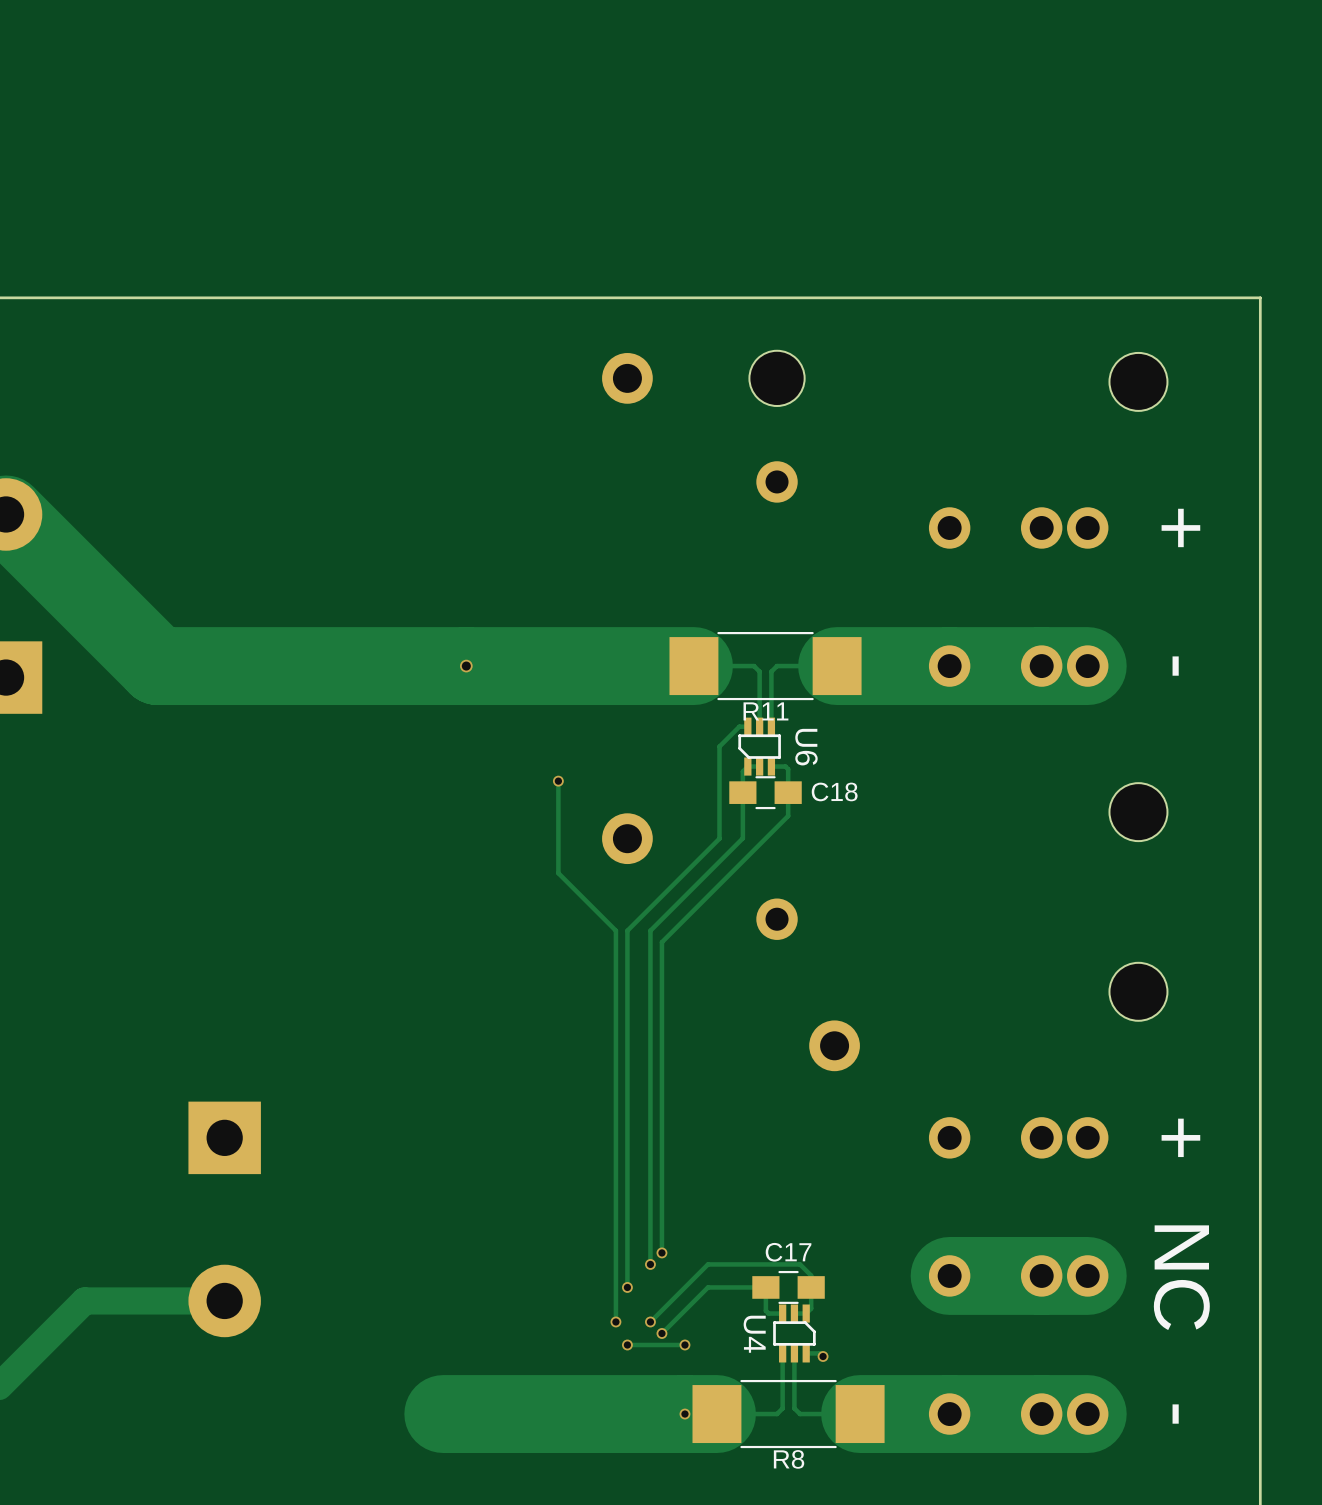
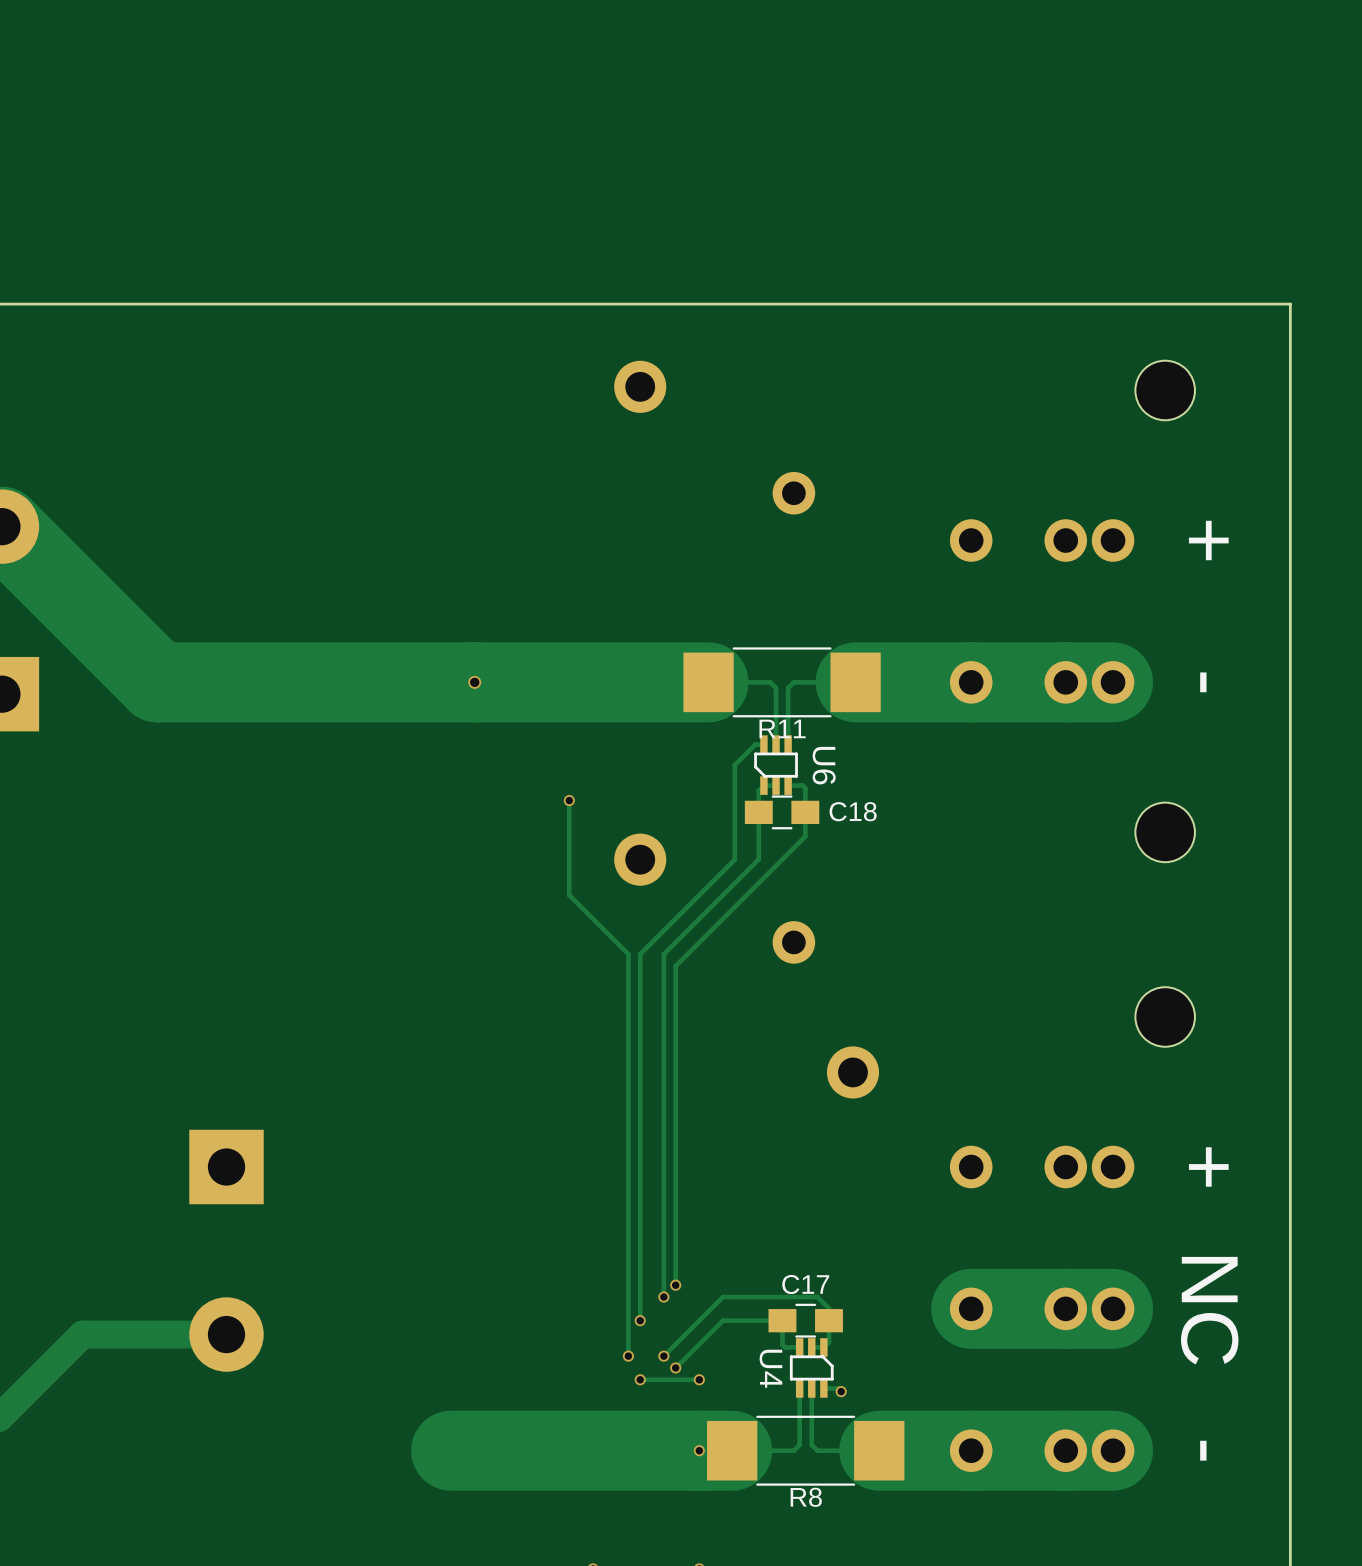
part: (777, 378) -> none

